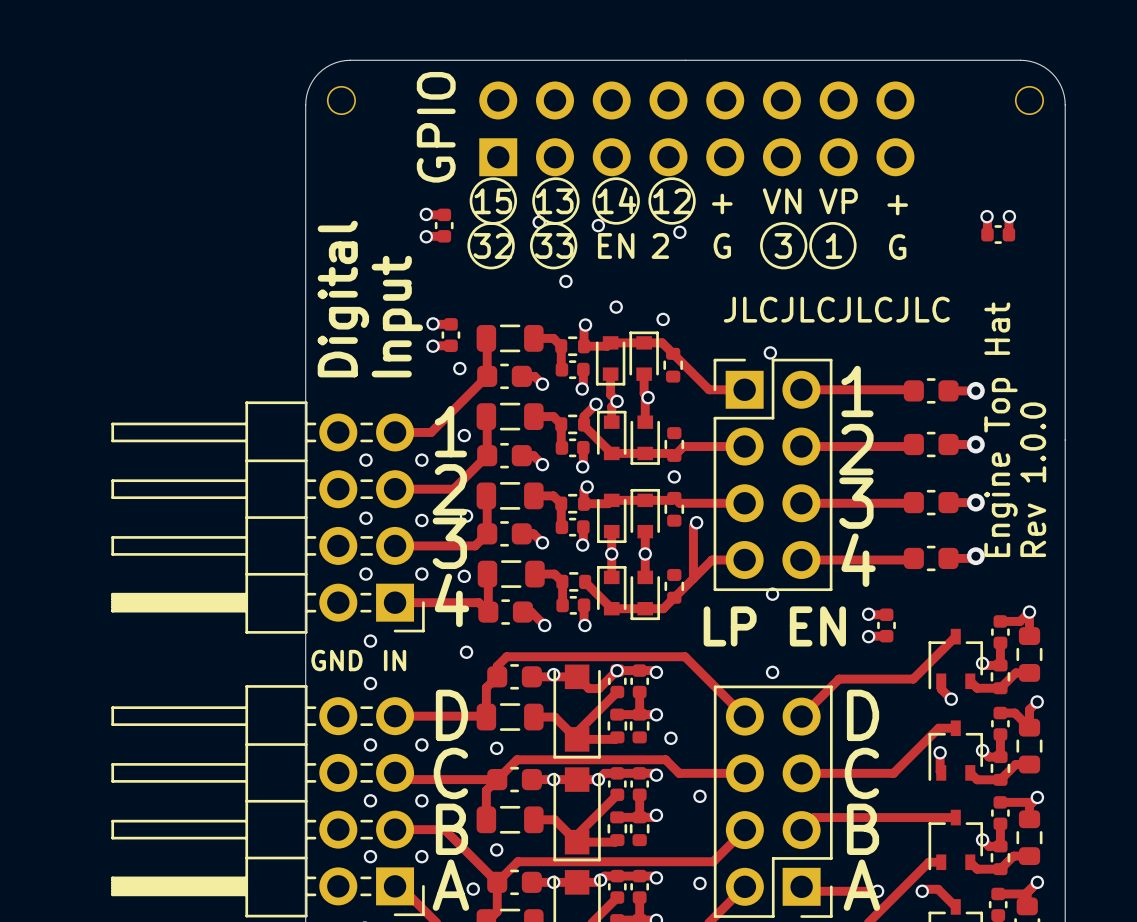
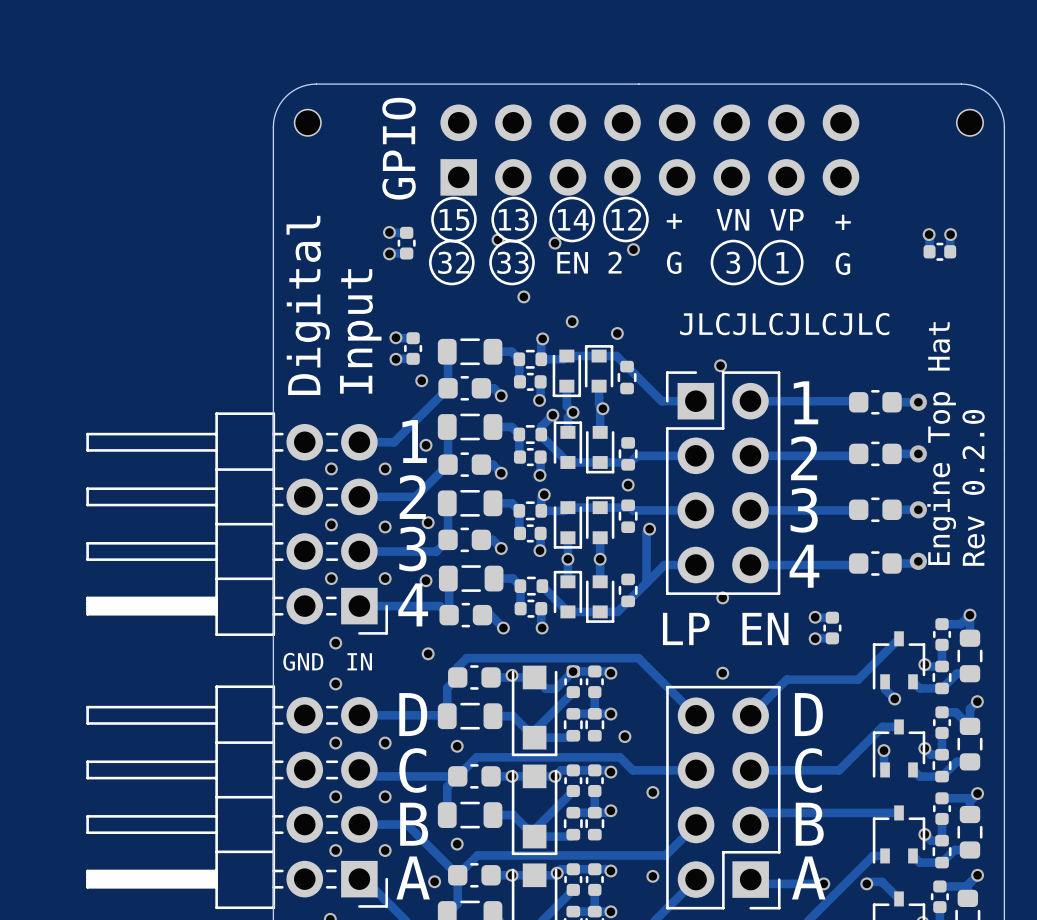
text: Rev 1.0.0 (1033, 479) -> Rev 0.2.0 (973, 487)

